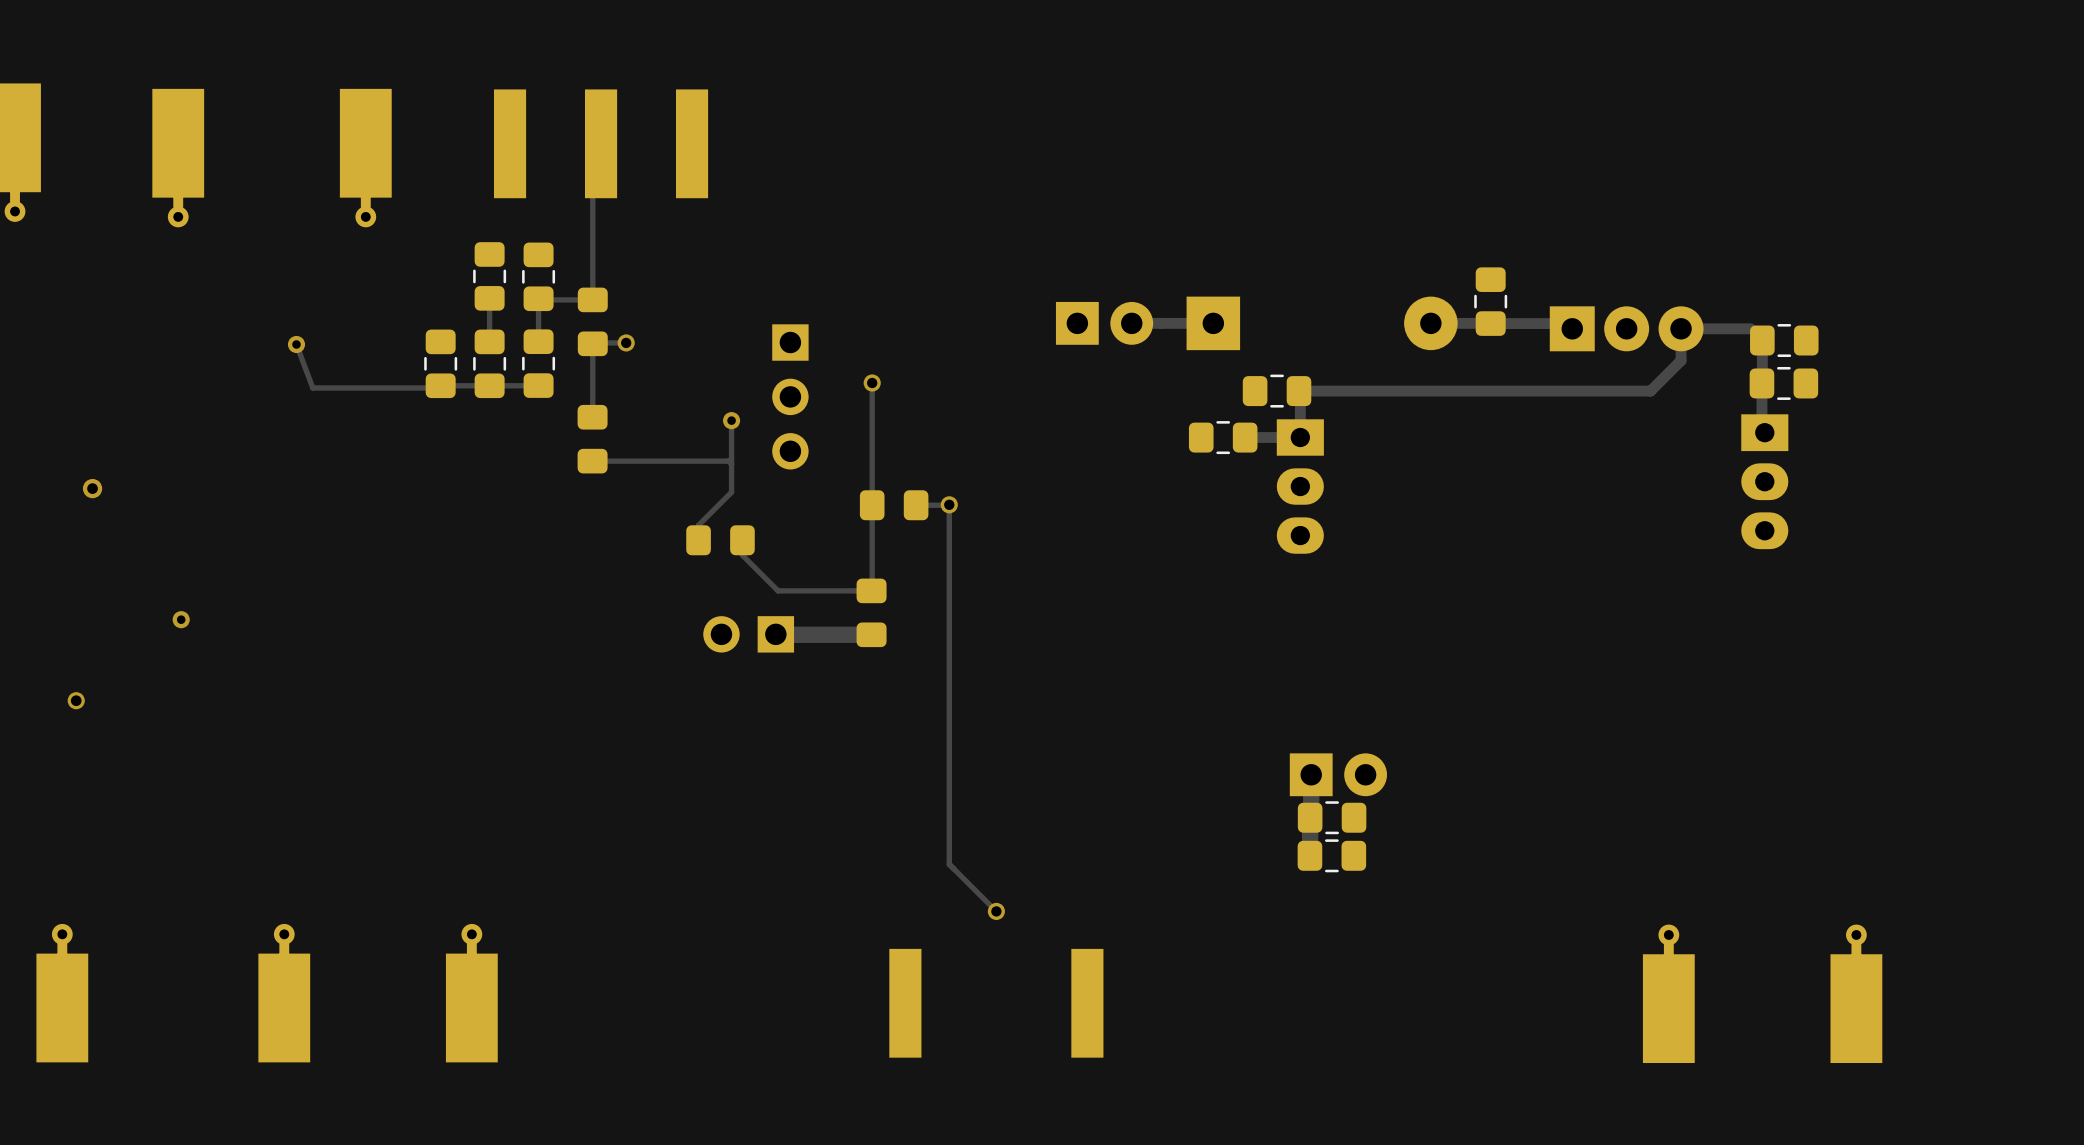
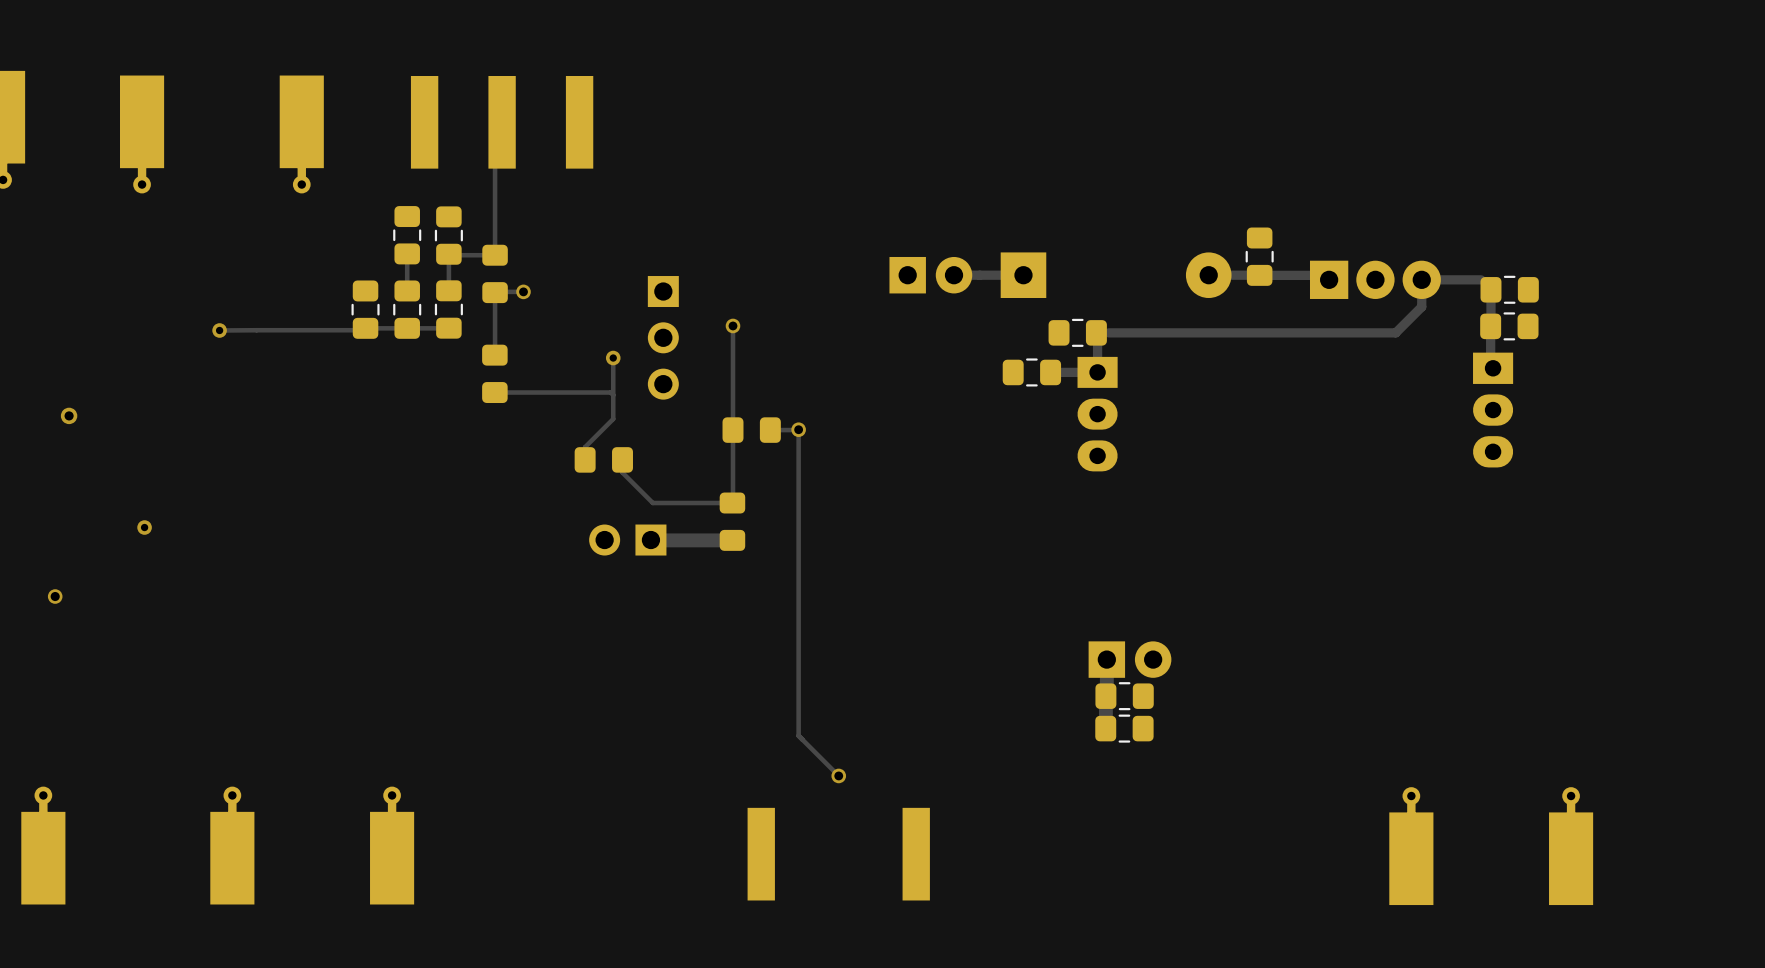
track: (296, 344) (312, 387) -> (219, 330) (256, 330)
via position: (296, 344) -> (219, 330)

